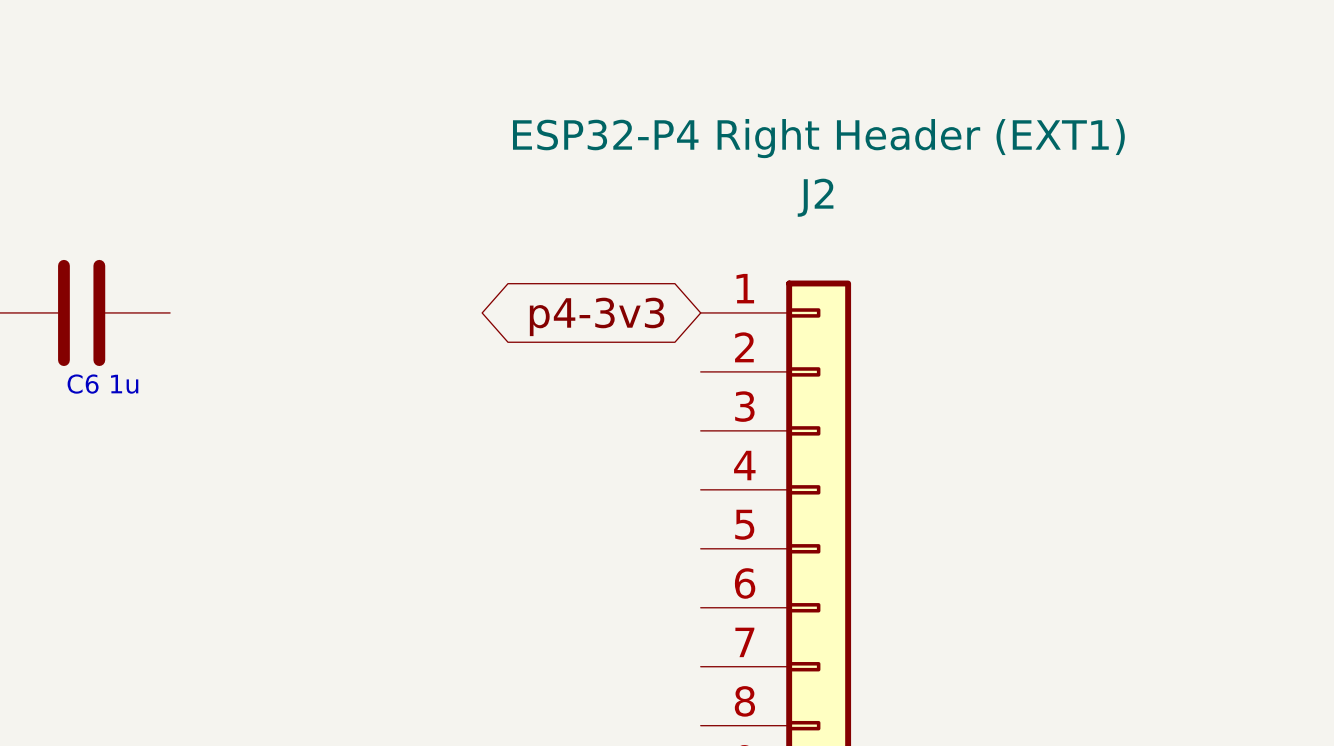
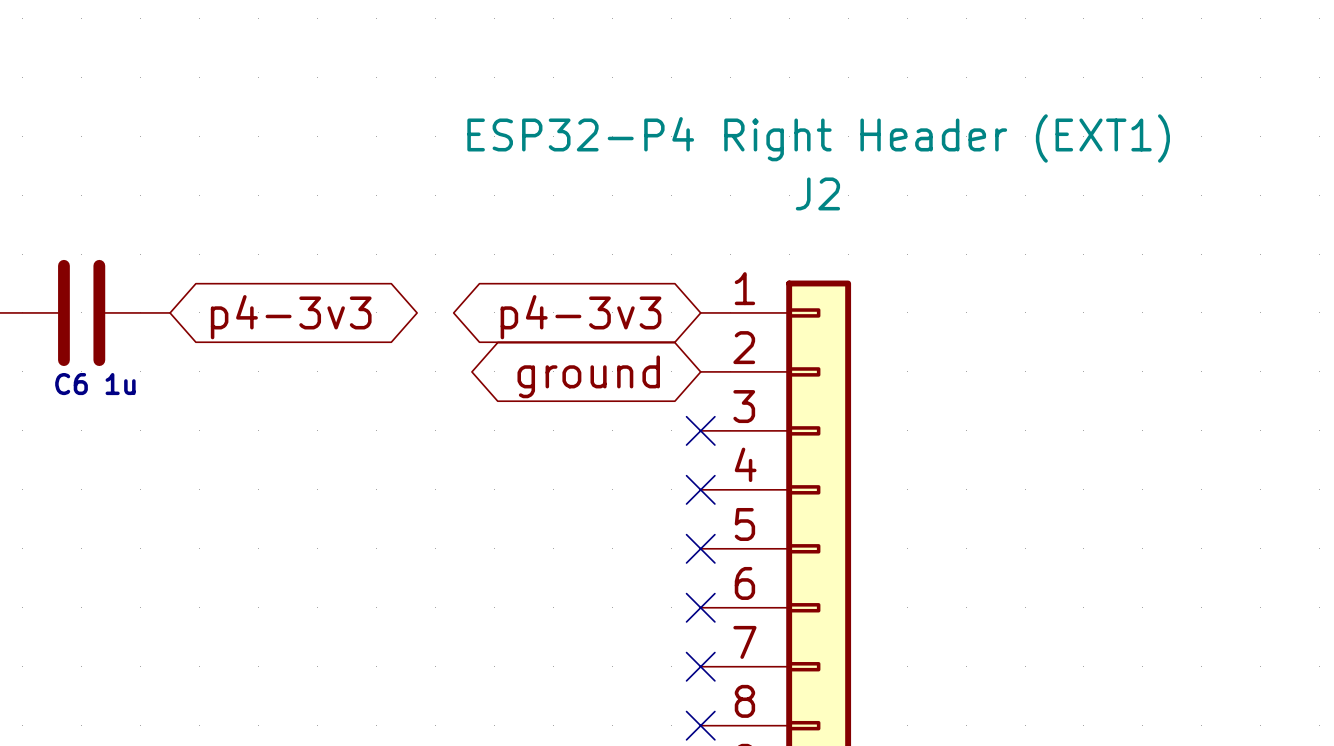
global label: none -> p4-3v3 (291, 317)
global label: none -> ground (588, 376)
no-connect mark: none -> (700, 430)
no-connect mark: none -> (700, 489)
no-connect mark: none -> (700, 548)
no-connect mark: none -> (700, 607)
no-connect mark: none -> (700, 666)
no-connect mark: none -> (700, 725)

